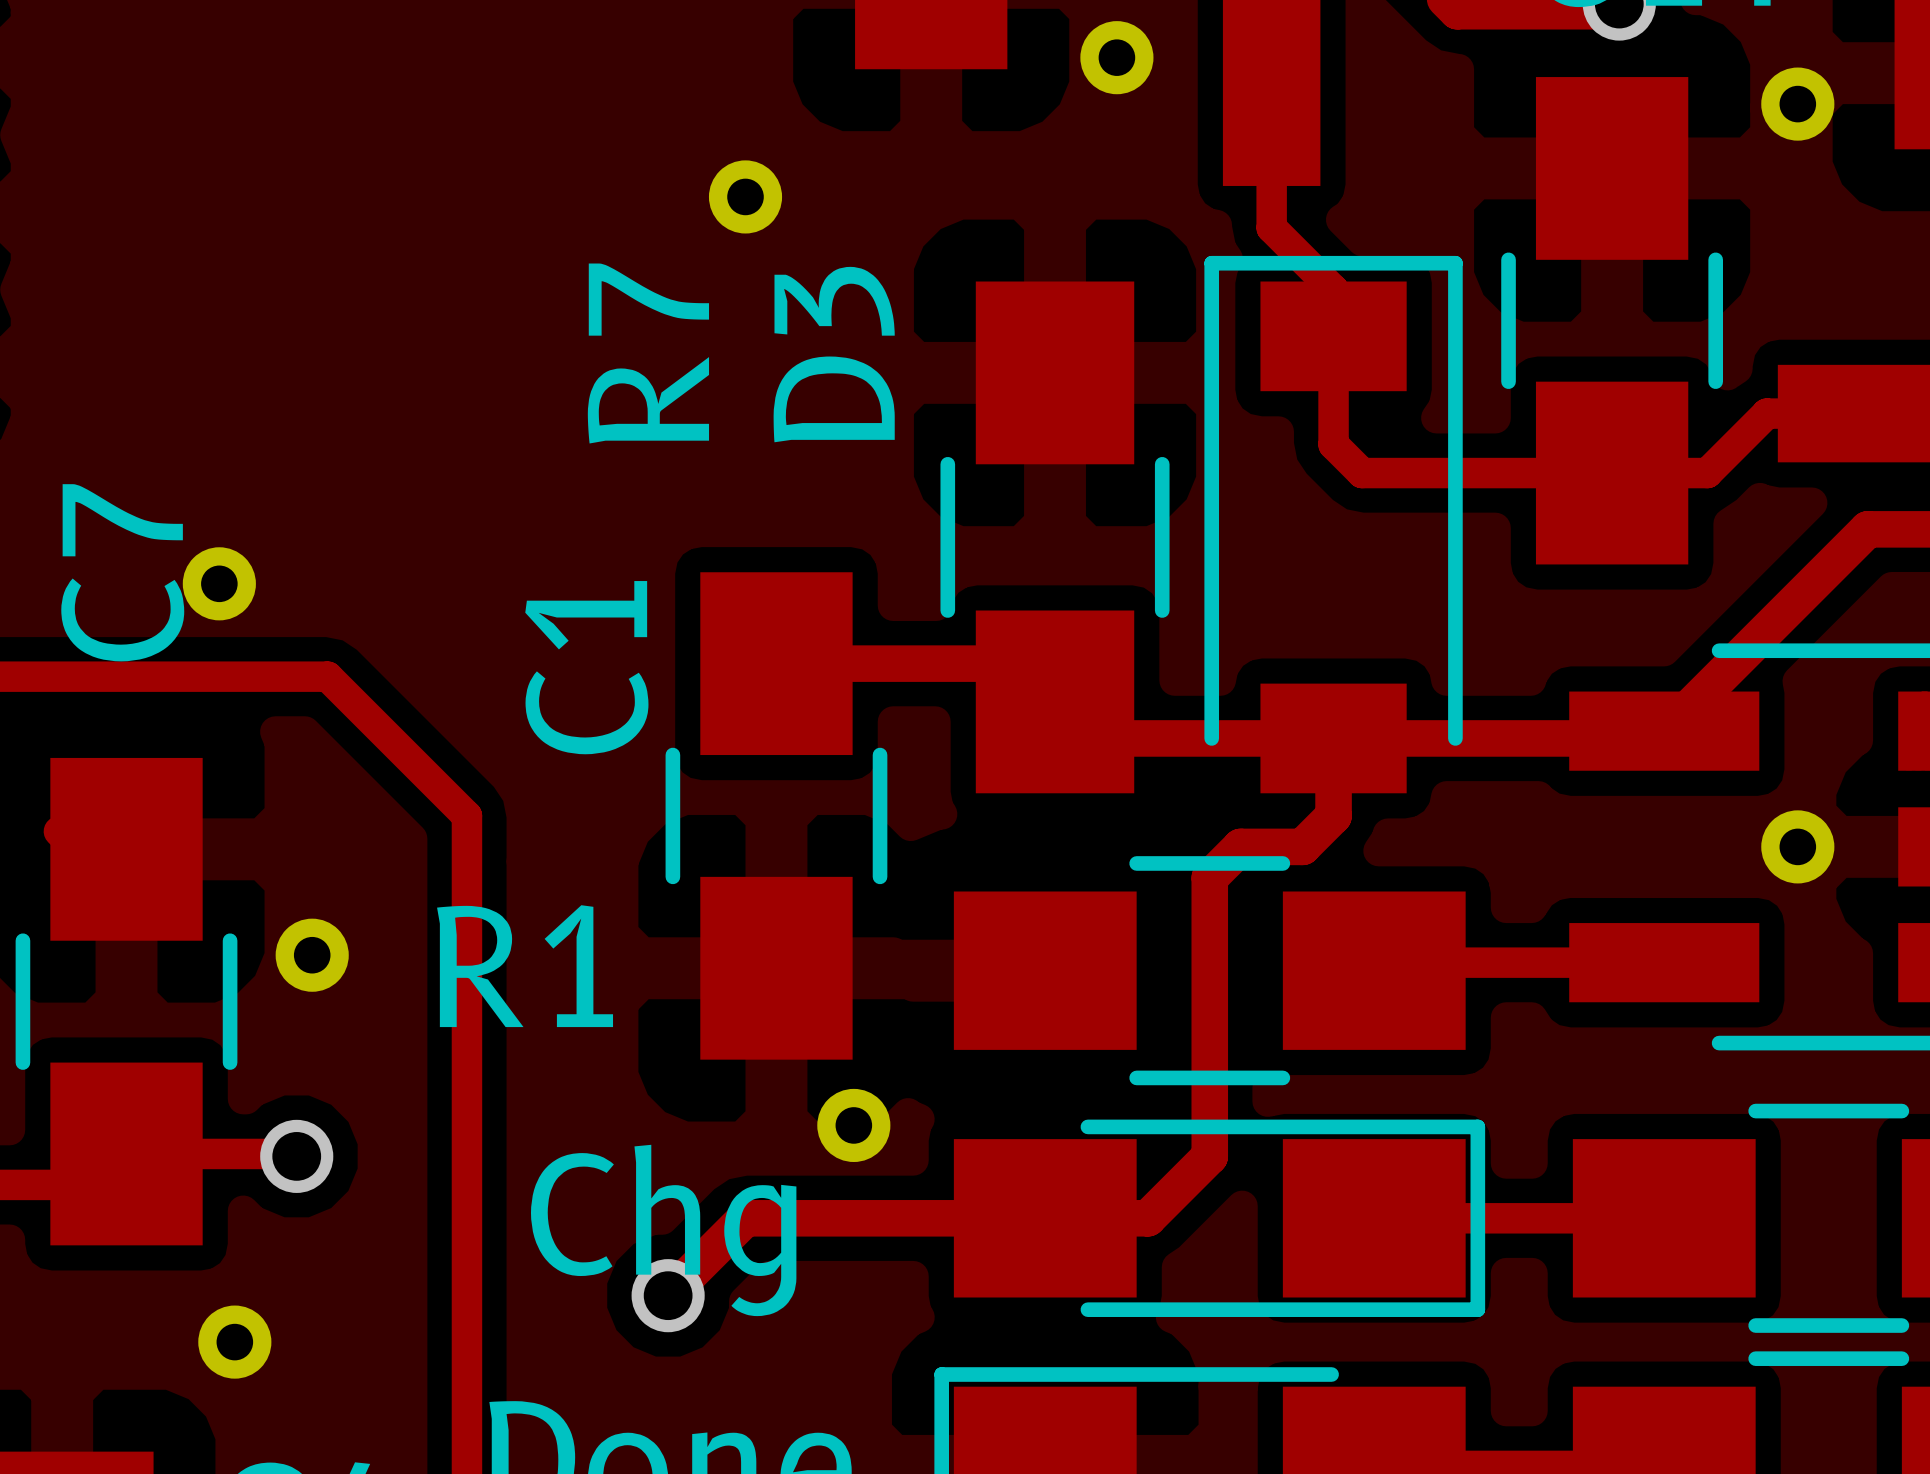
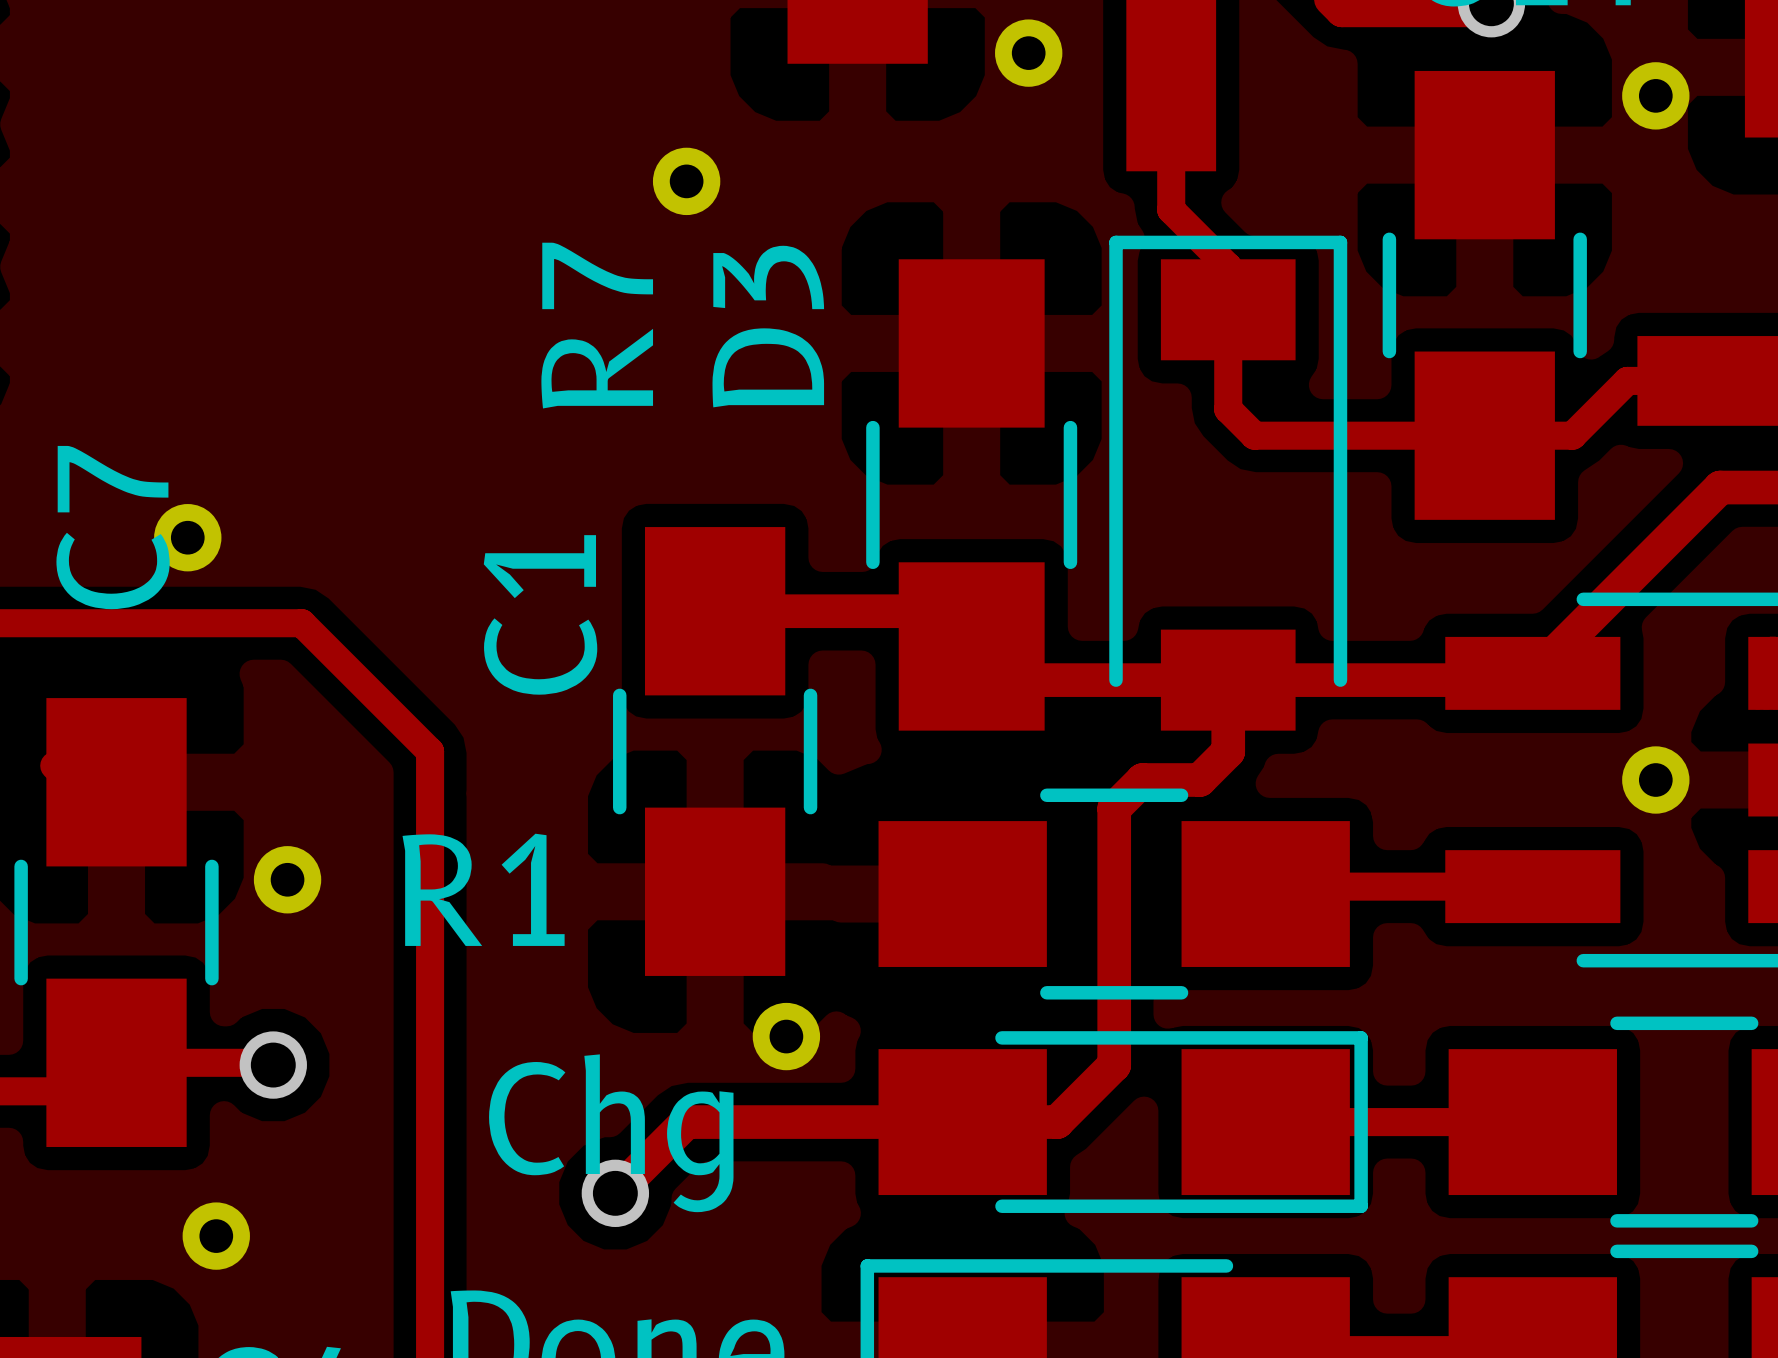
part position: (219, 583) -> (187, 537)

